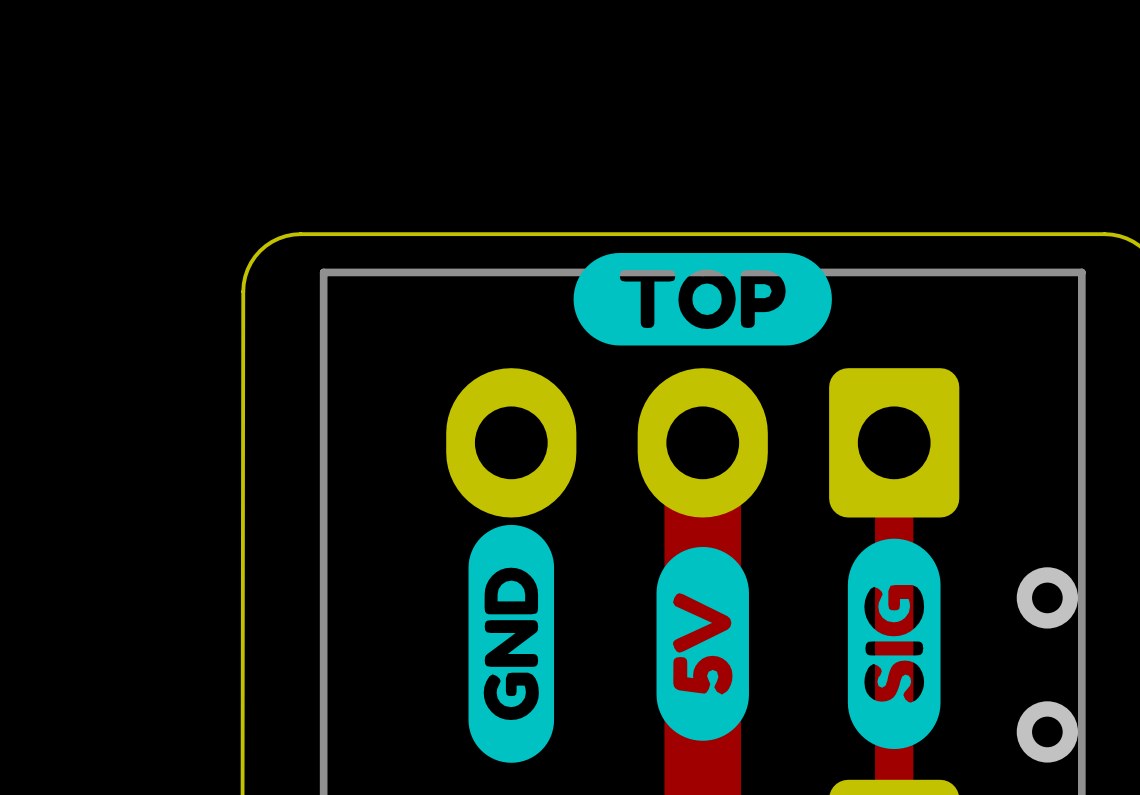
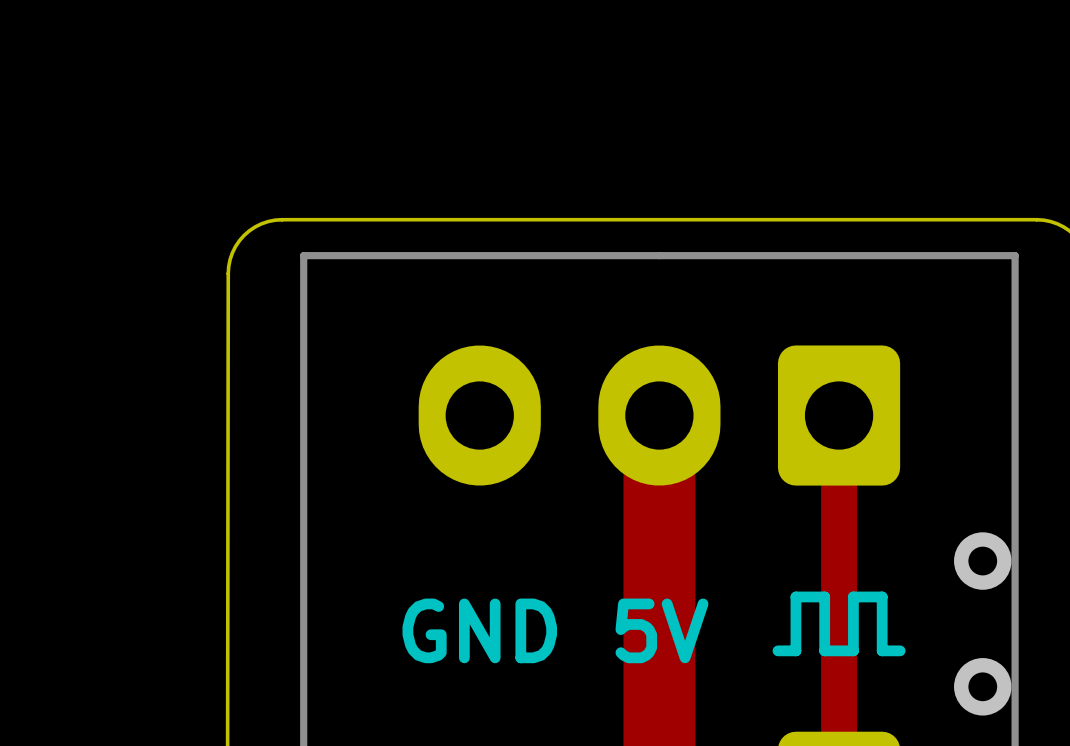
drawing: [573, 252, 832, 346] -> none
drawing: [468, 524, 555, 763] -> none
drawing: [847, 538, 941, 750] -> none
drawing: [656, 546, 749, 741] -> none
text: none -> GND (479, 630)
text: none -> 5V (661, 630)
line: none -> (777, 650) (795, 650) (795, 596) (824, 596) (824, 650) (853, 650) (853, 596) (882, 596) (882, 650) (900, 650)

